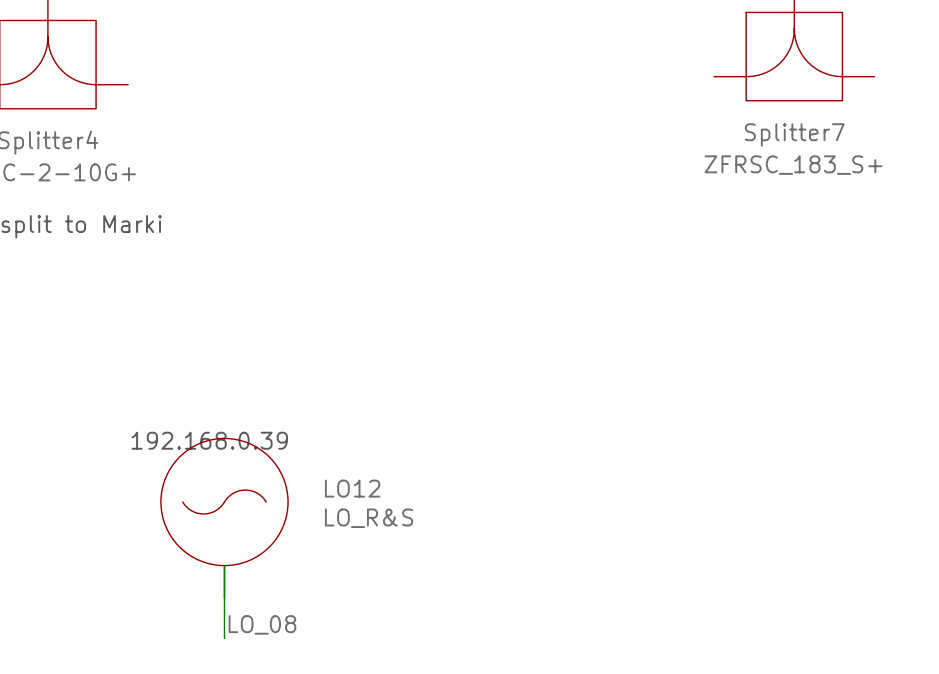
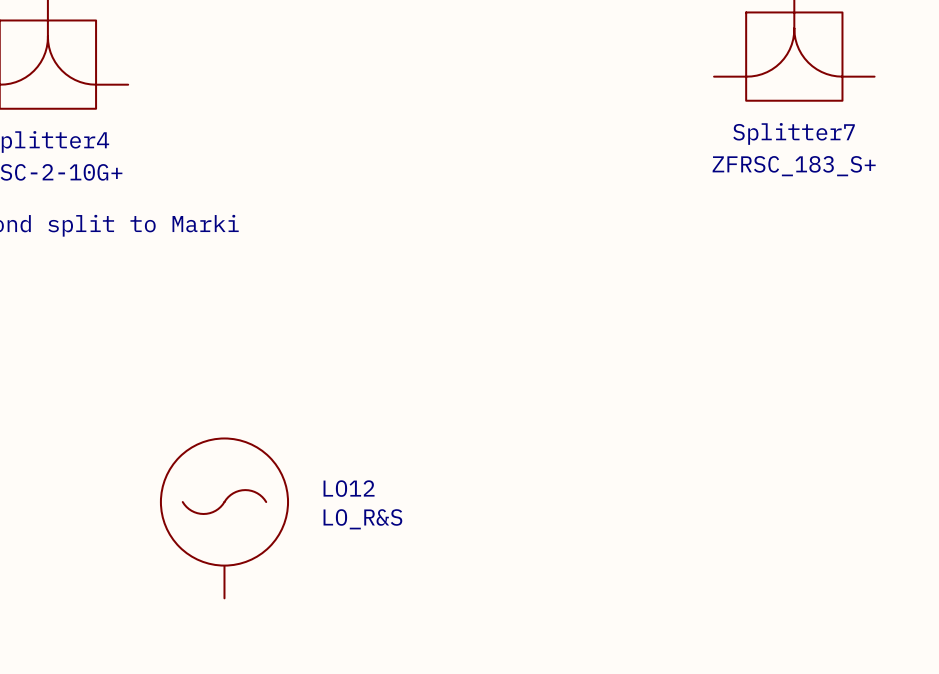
text: 192.168.0.39 (209, 440) -> none
wire: (224, 566) (224, 638) -> none
label: LO_08 (262, 624) -> none

